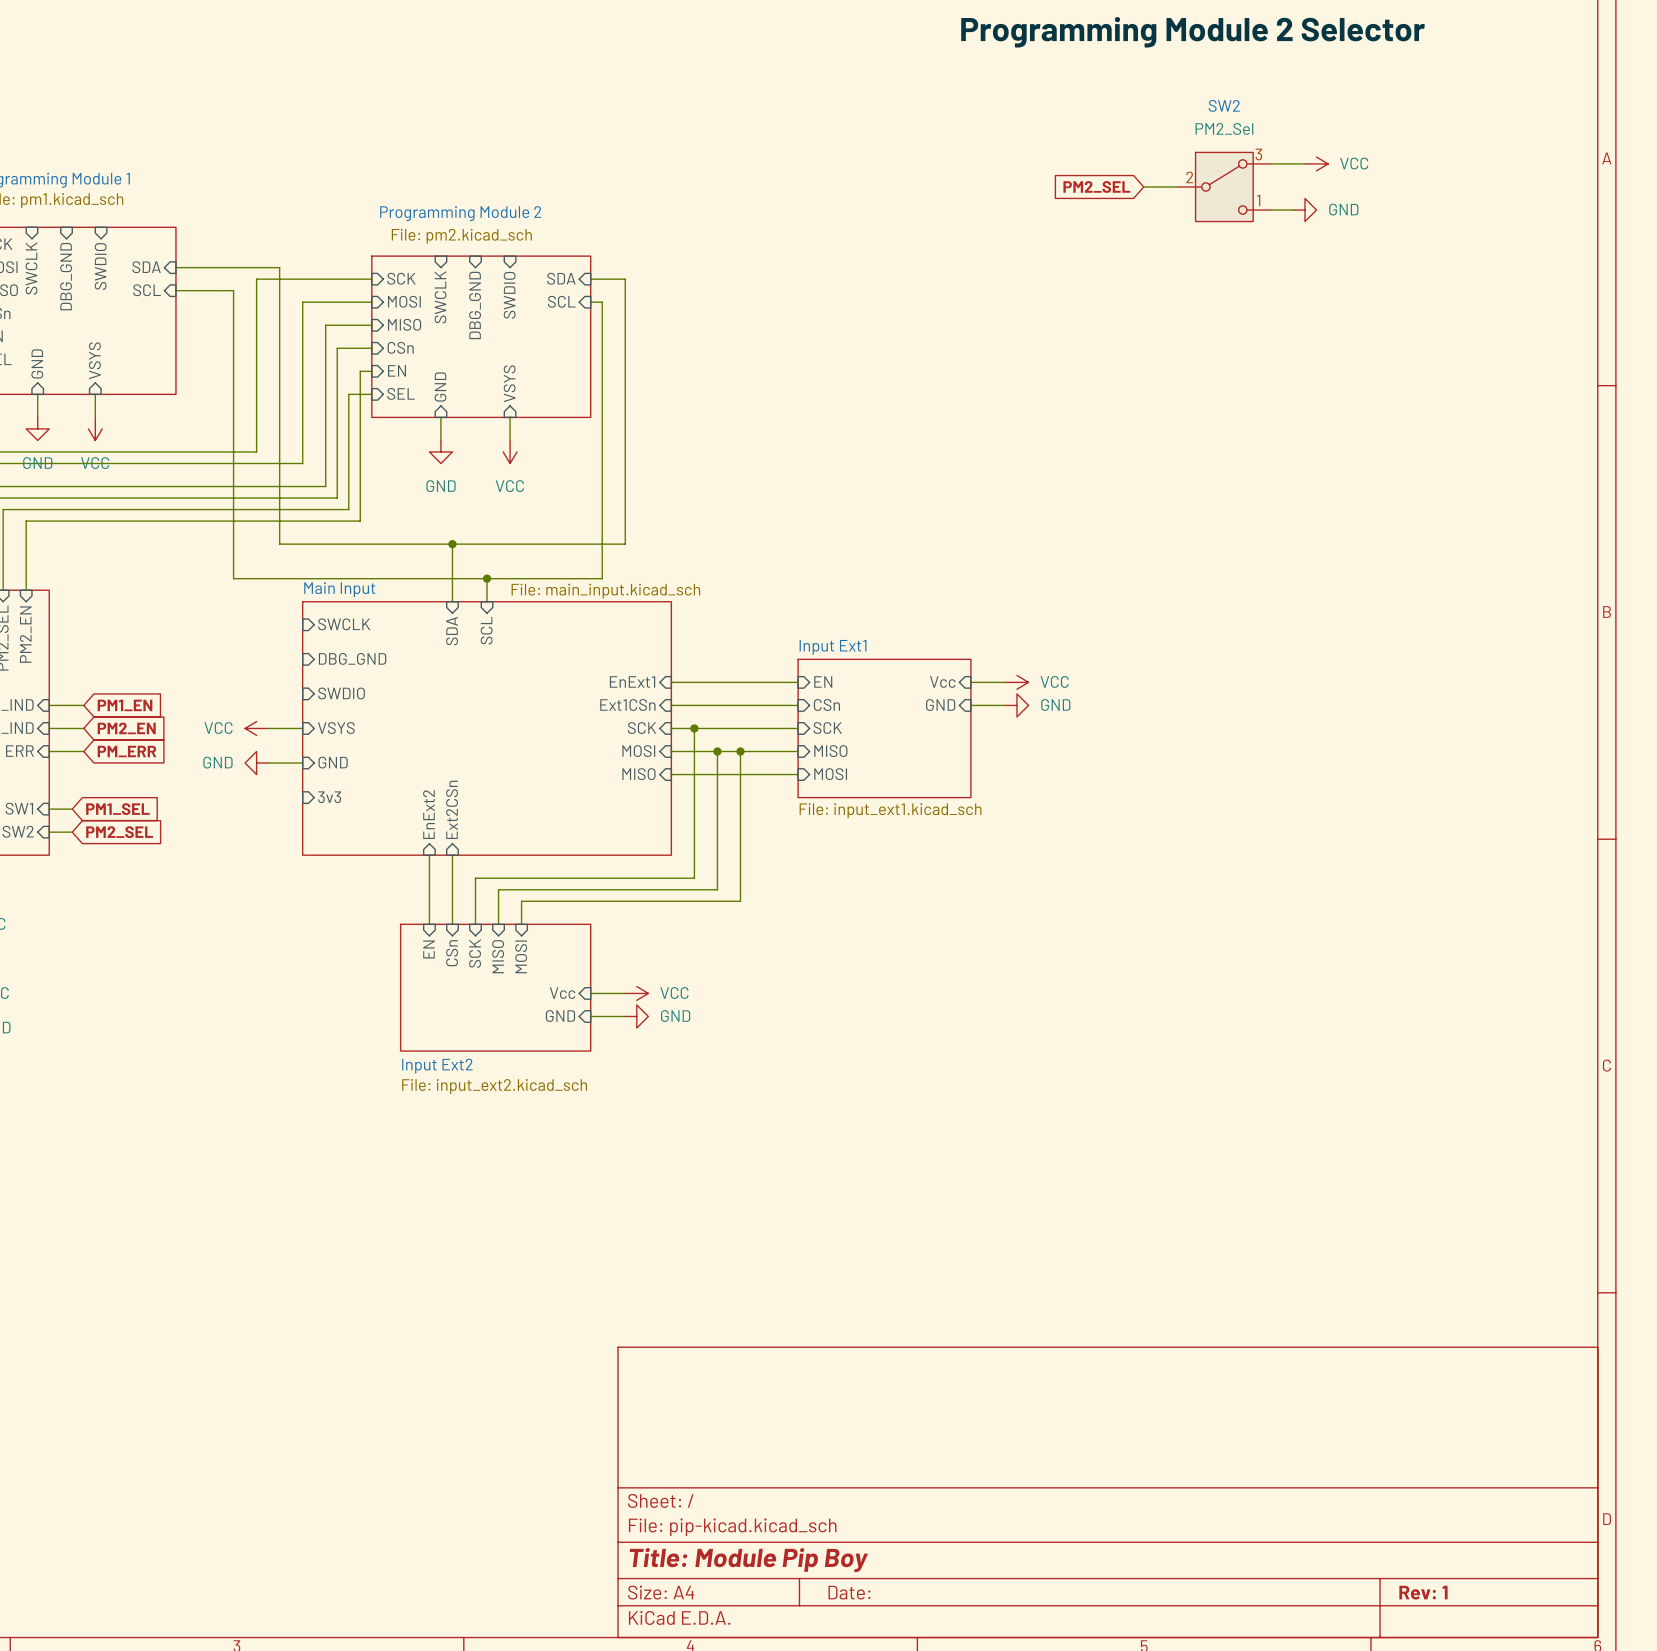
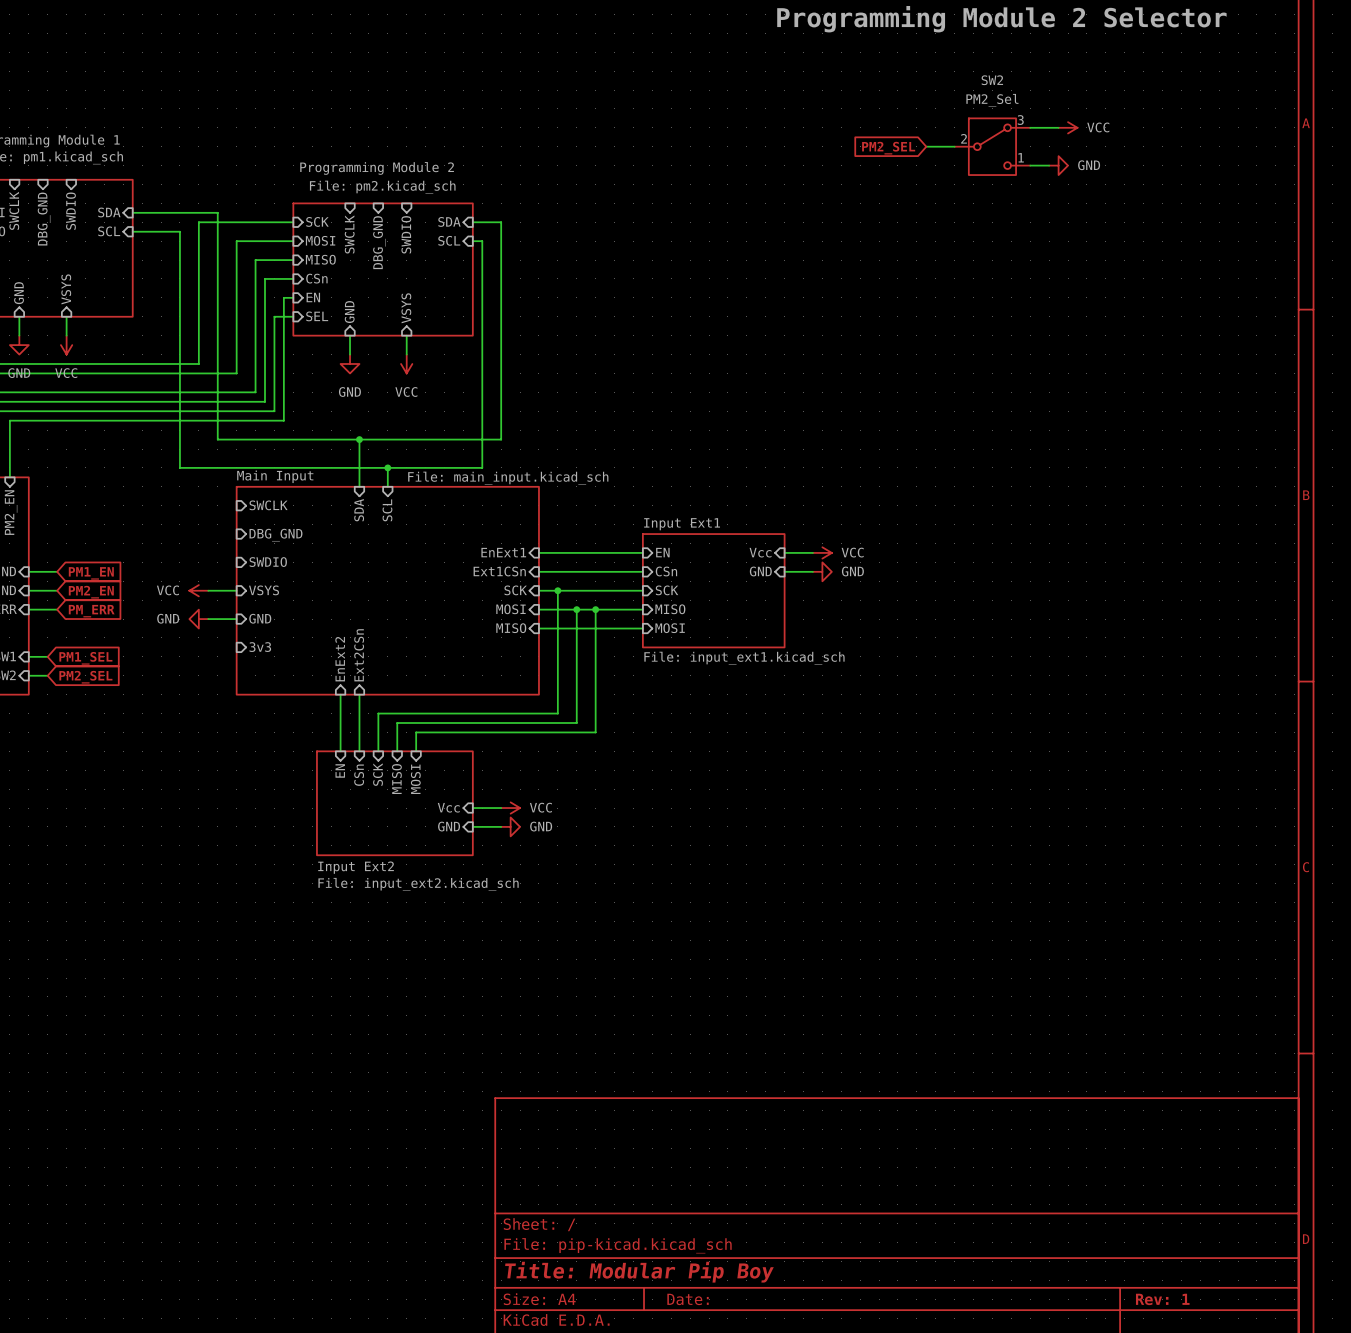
title block: Title: Module Pip Boy (748, 1560) -> Title: Modular Pip Boy (639, 1272)

